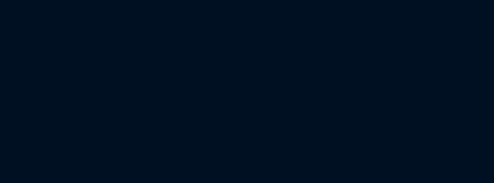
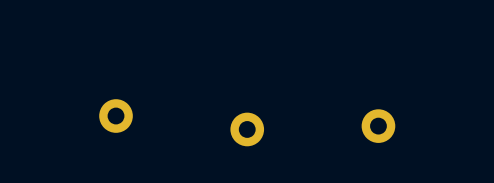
part: none -> (116, 116)
part: none -> (378, 126)
part: none -> (247, 129)

